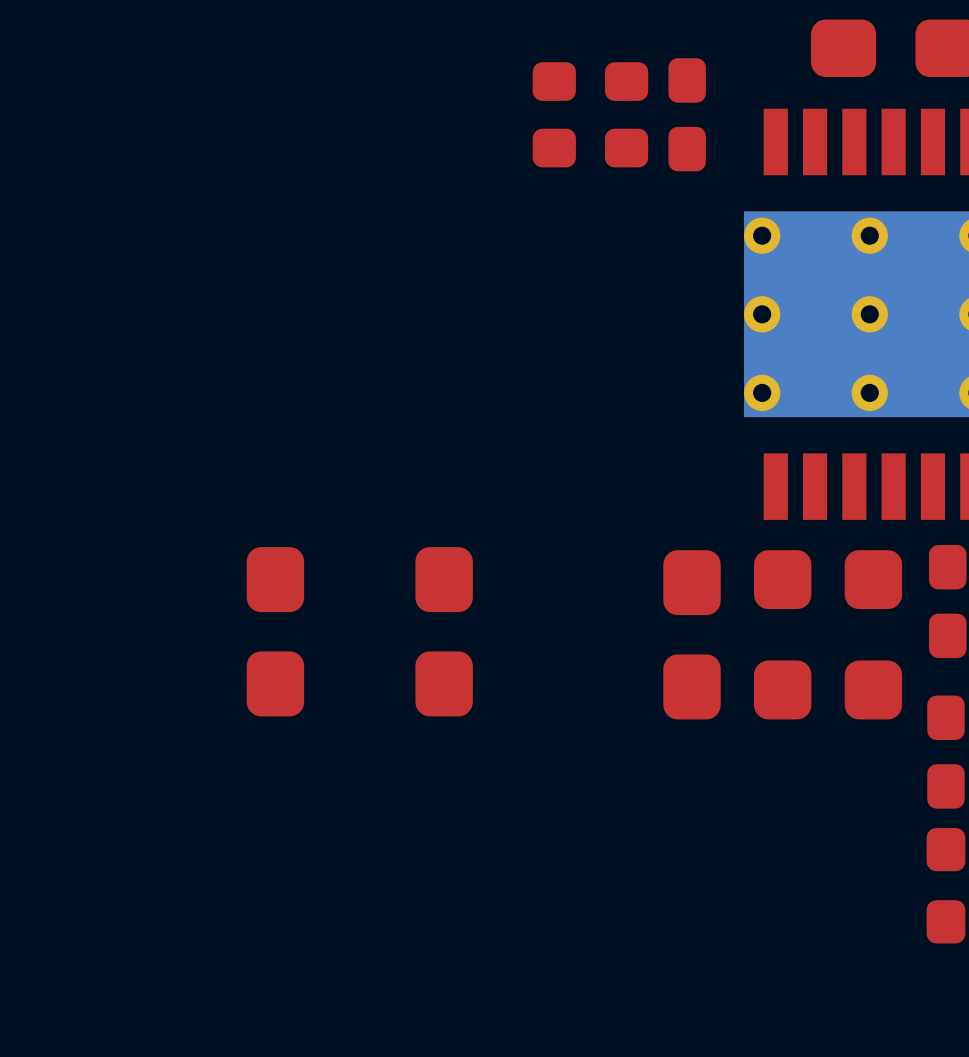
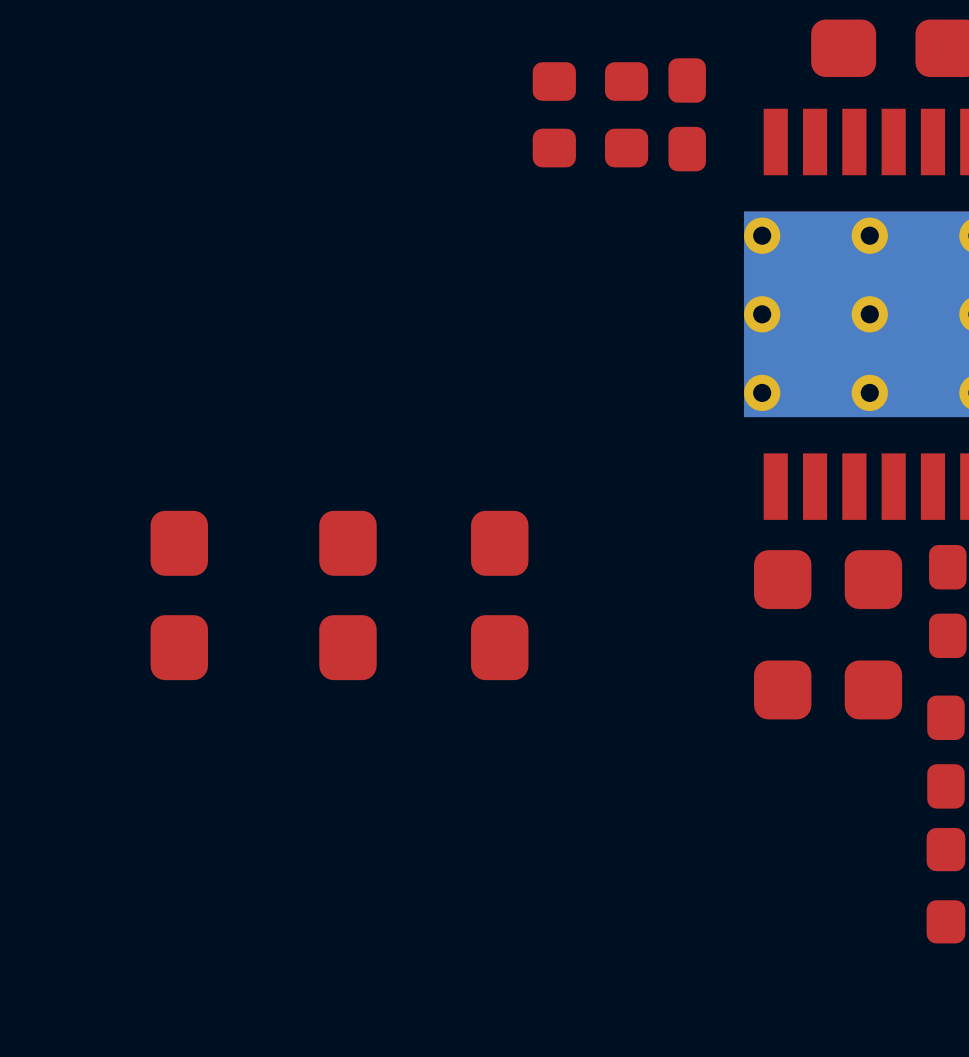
part: none -> (179, 595)
part: none -> (347, 595)
part: none -> (499, 595)
part: (275, 631) -> none
part: (444, 631) -> none
part: (692, 634) -> none

